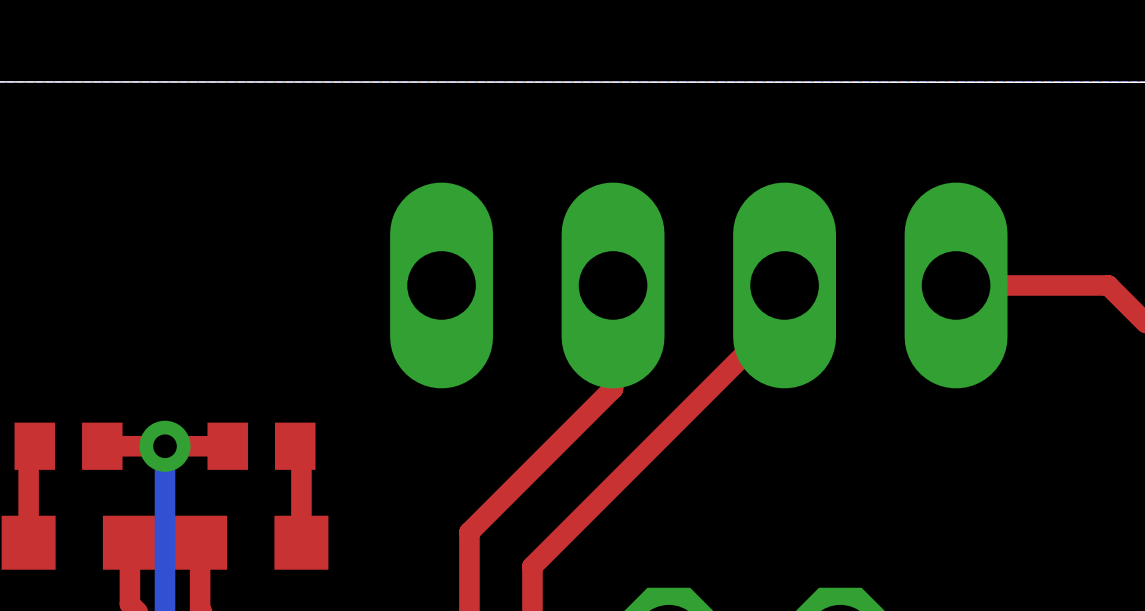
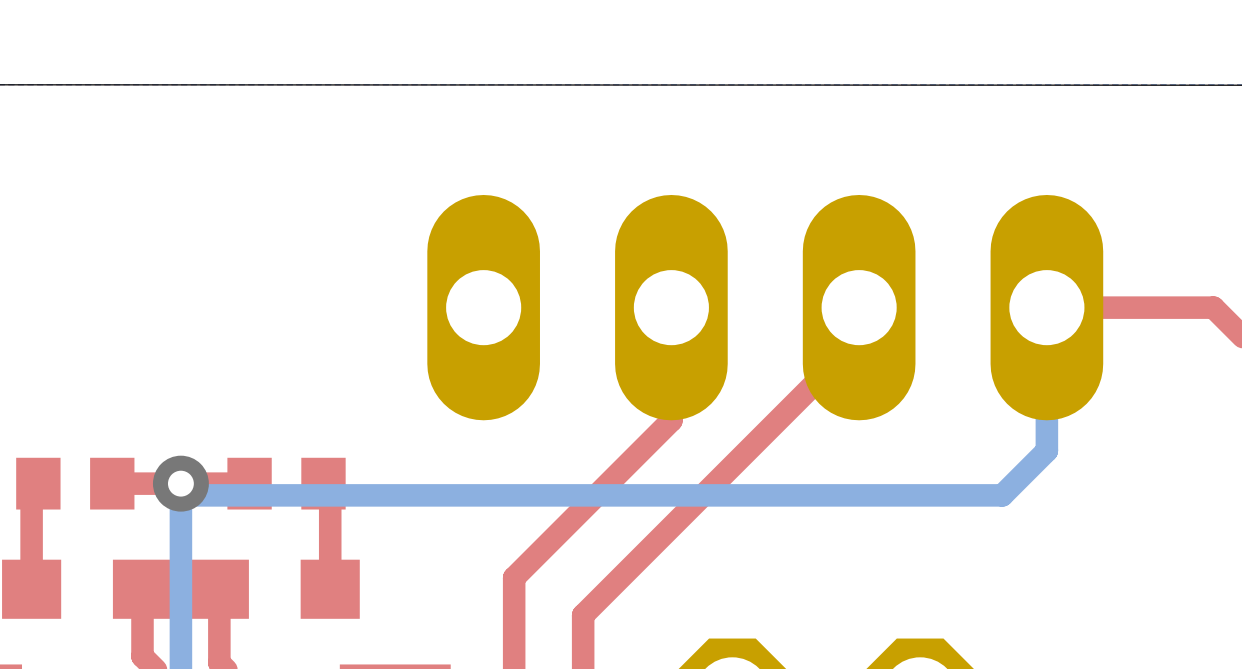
bottom track: none -> (1046, 307) (1046, 450) (1002, 495) (192, 495) (180, 483)

